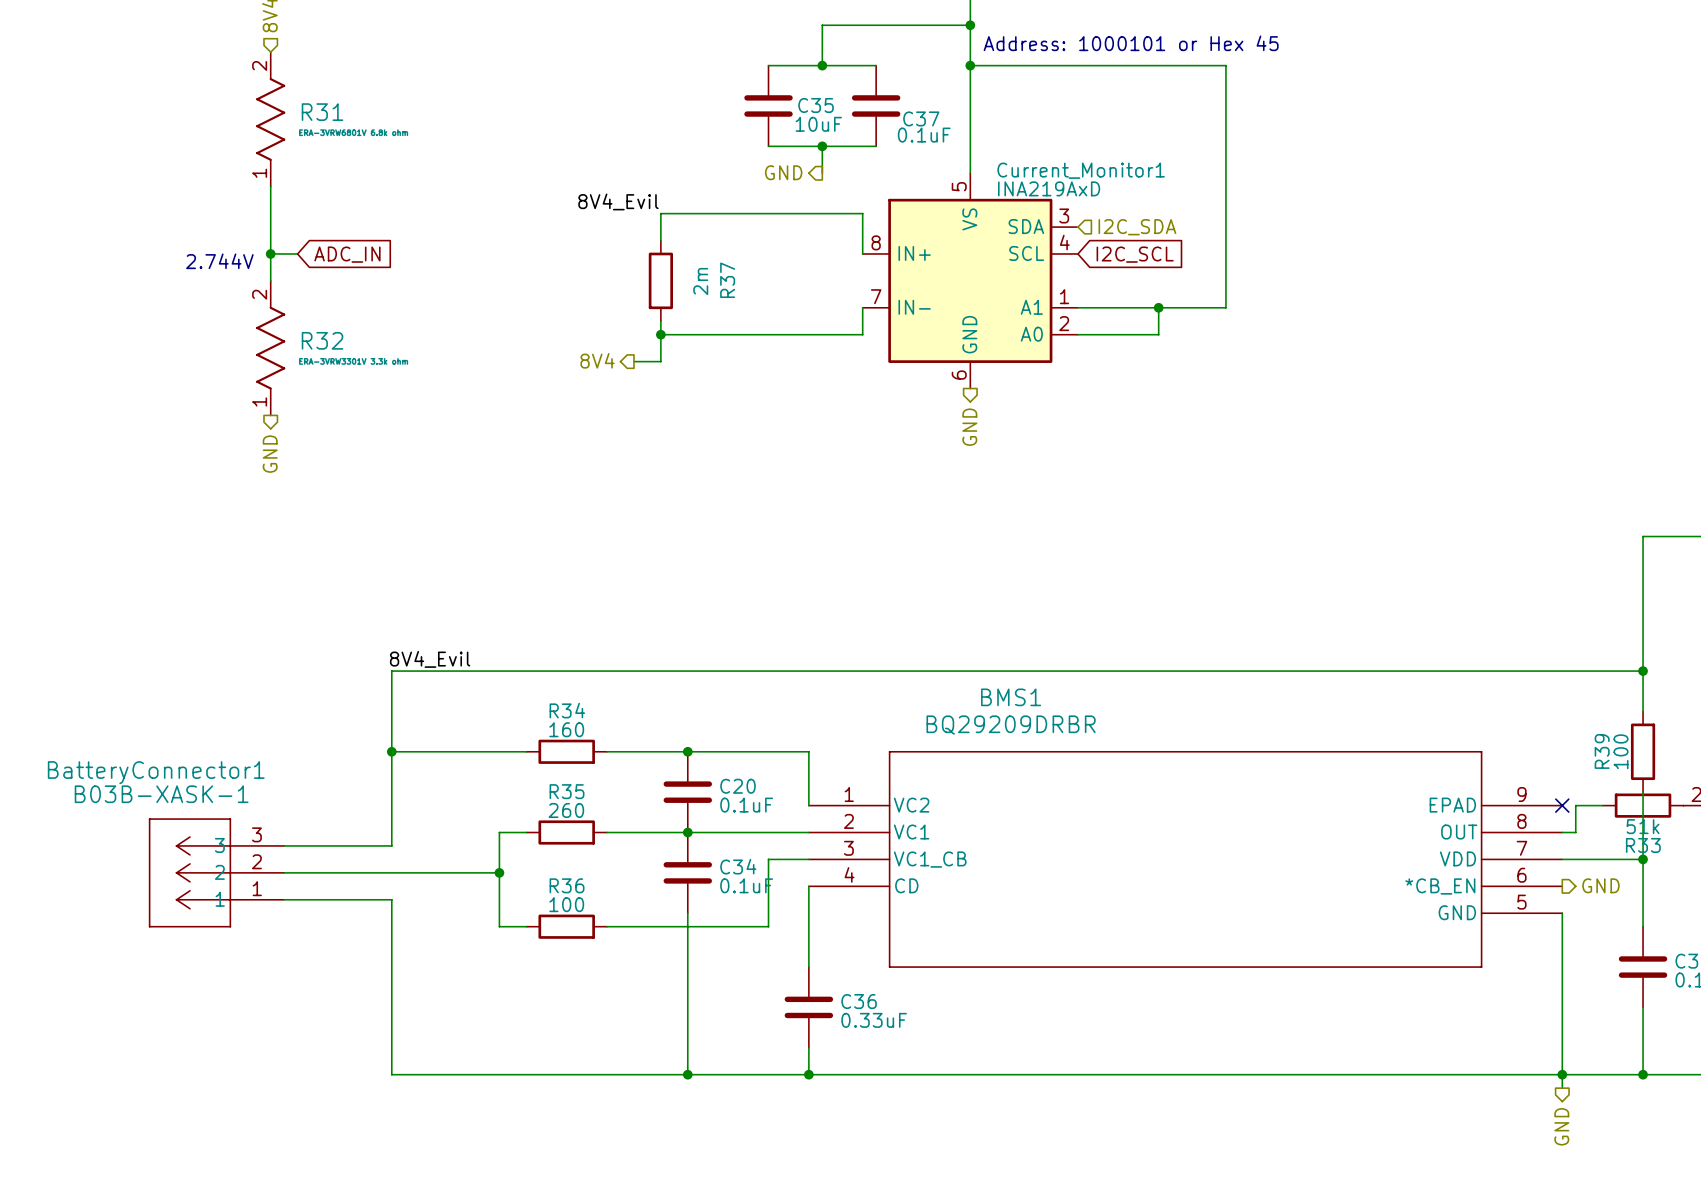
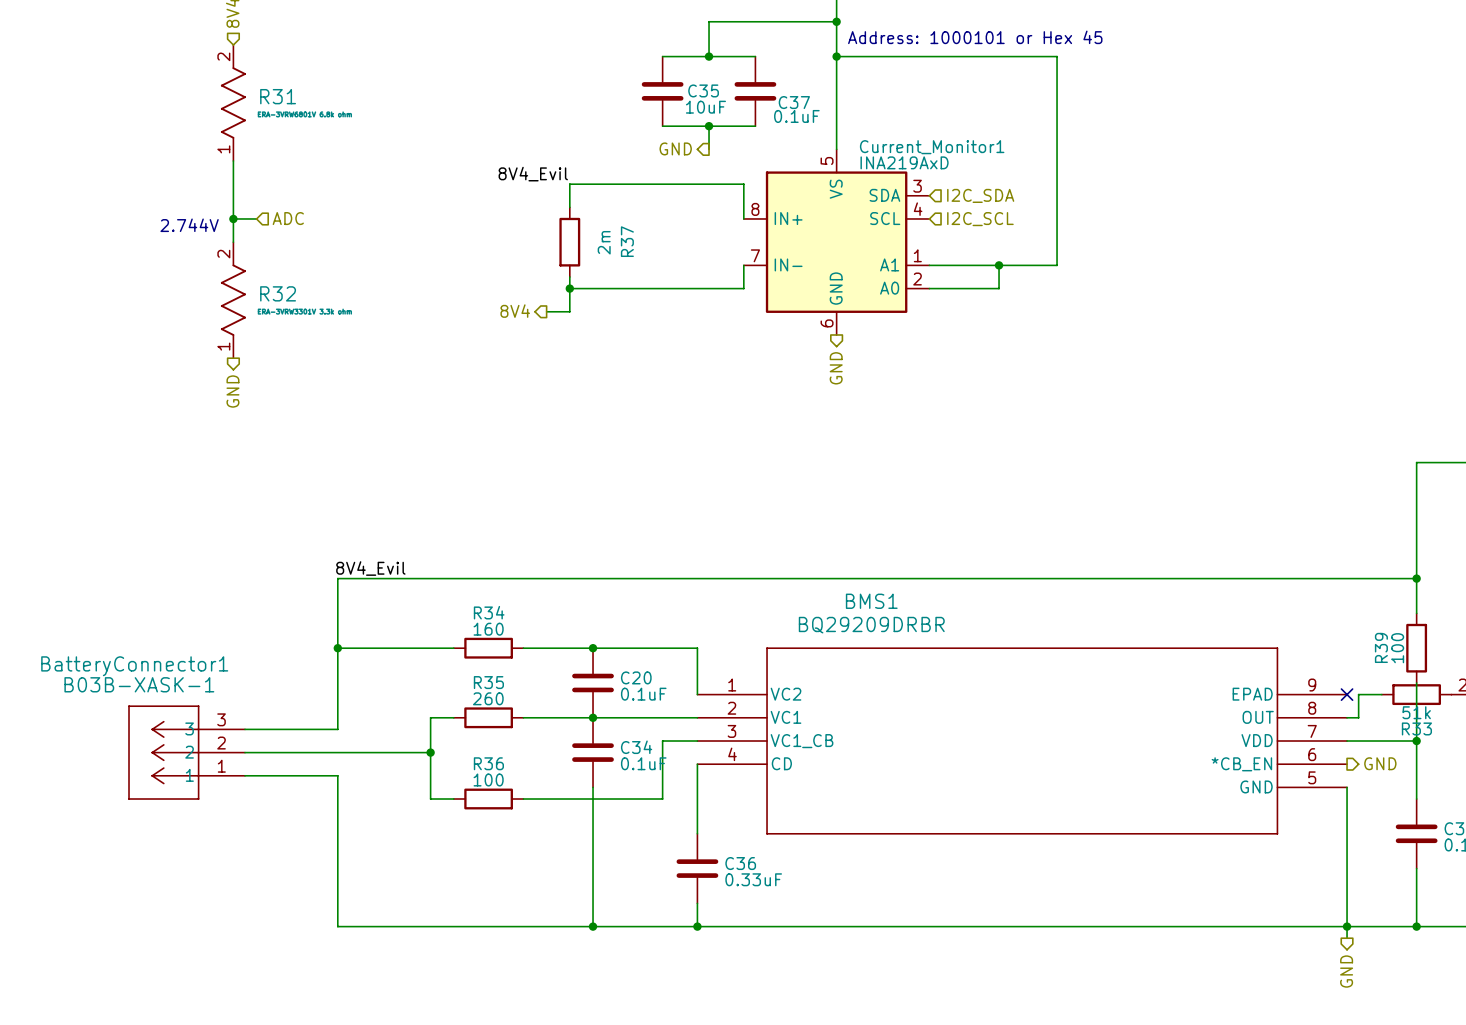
hierarchical label: none -> ADC (288, 218)
global label: ADC_IN (347, 254) -> none
global label: I2C_SCL (1135, 254) -> none
hierarchical label: none -> I2C_SCL (980, 219)

